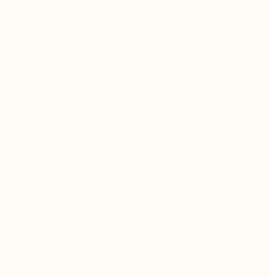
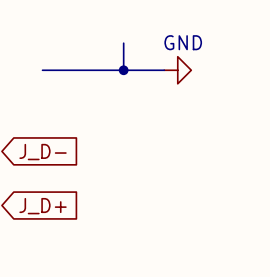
wire: none -> (123, 43) (123, 70)
wire: none -> (42, 70) (164, 70)
junction: none -> (123, 70)
power symbol: none -> GND (177, 70)
global label: none -> J_D- (43, 152)
global label: none -> J_D+ (43, 206)

